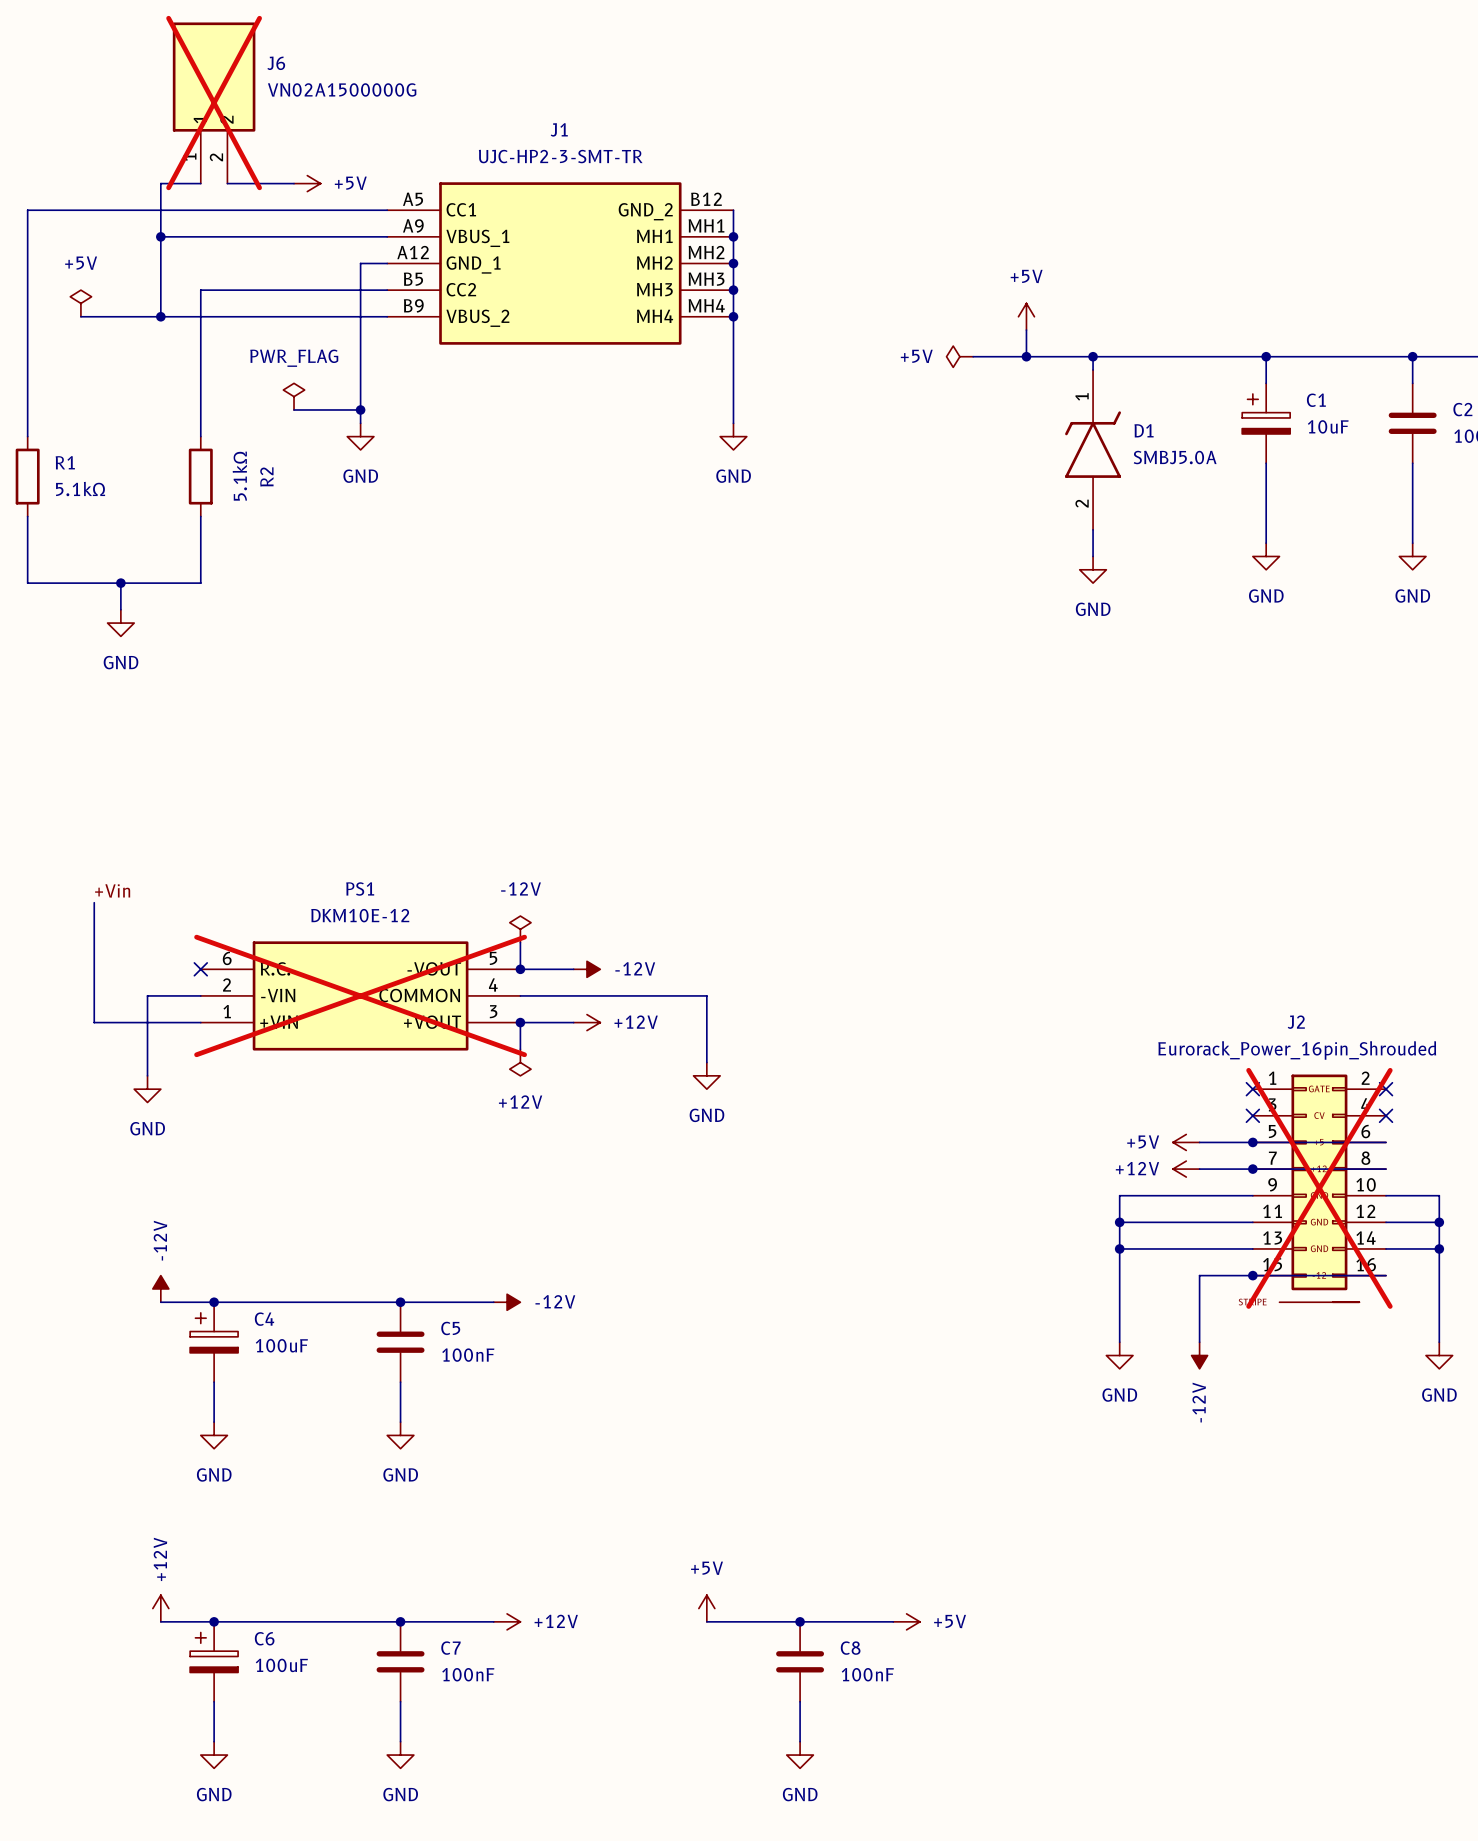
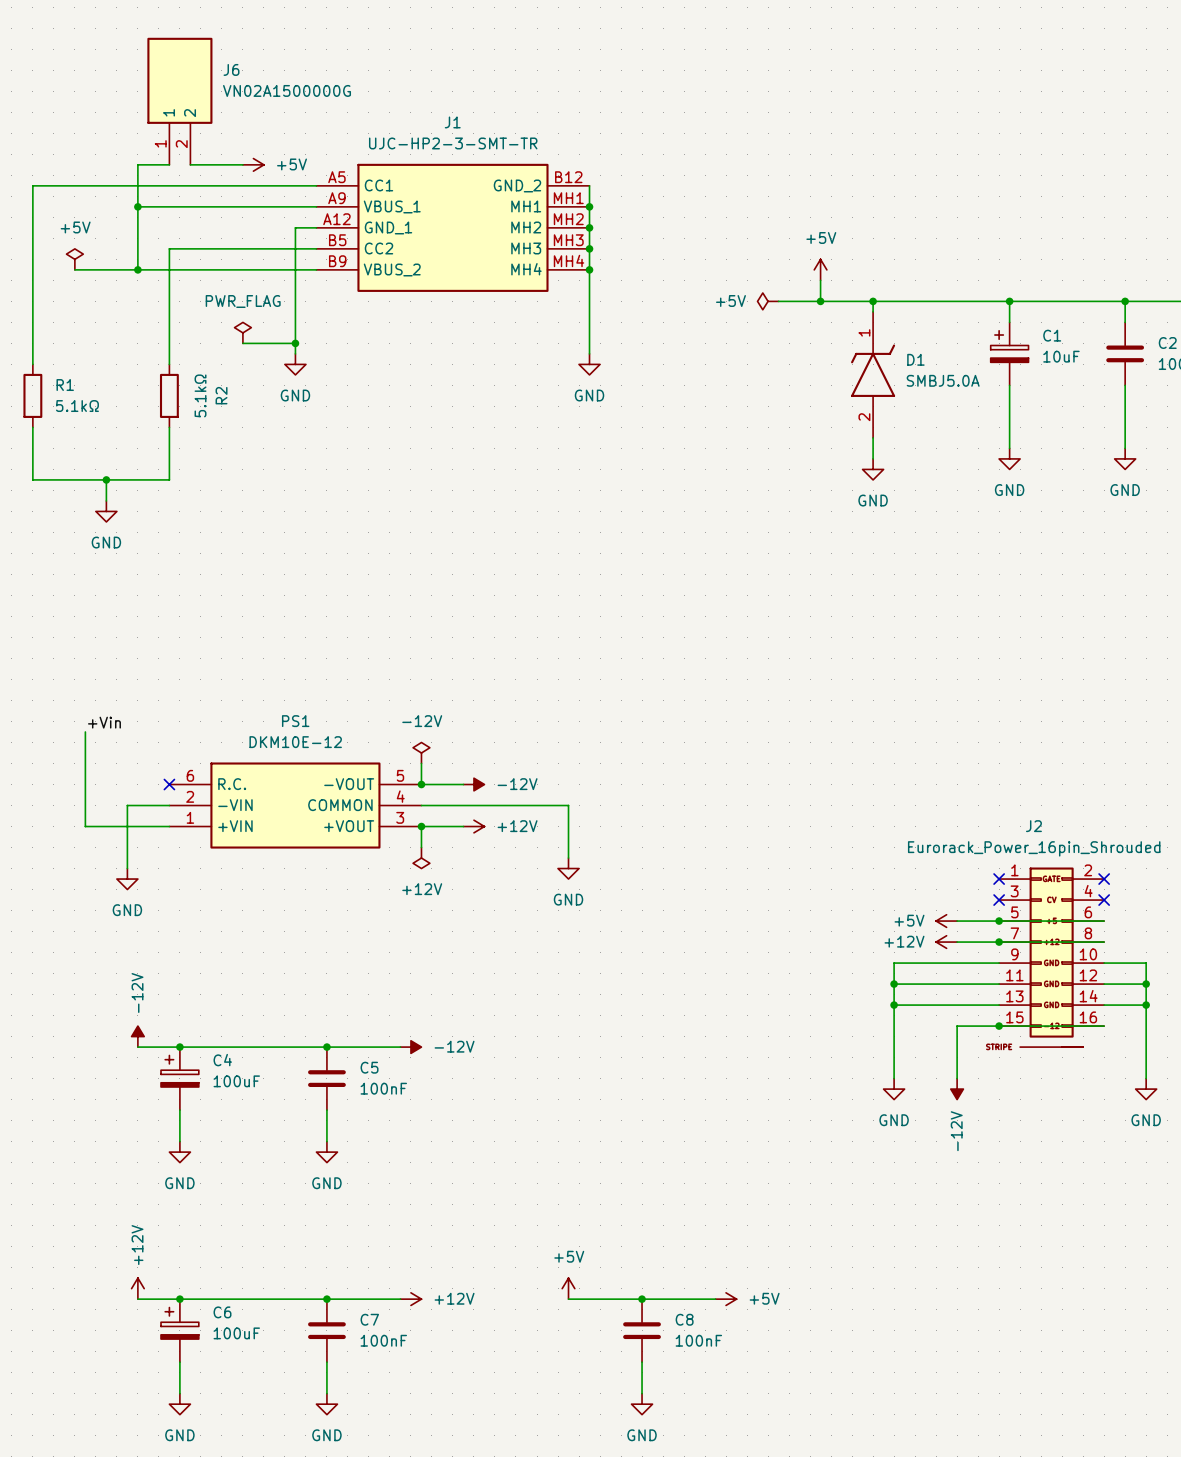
J6 do-not-place cross: (214, 103) -> none
PS1 do-not-place cross: (360, 995) -> none
J2 do-not-place cross: (1319, 1188) -> none

